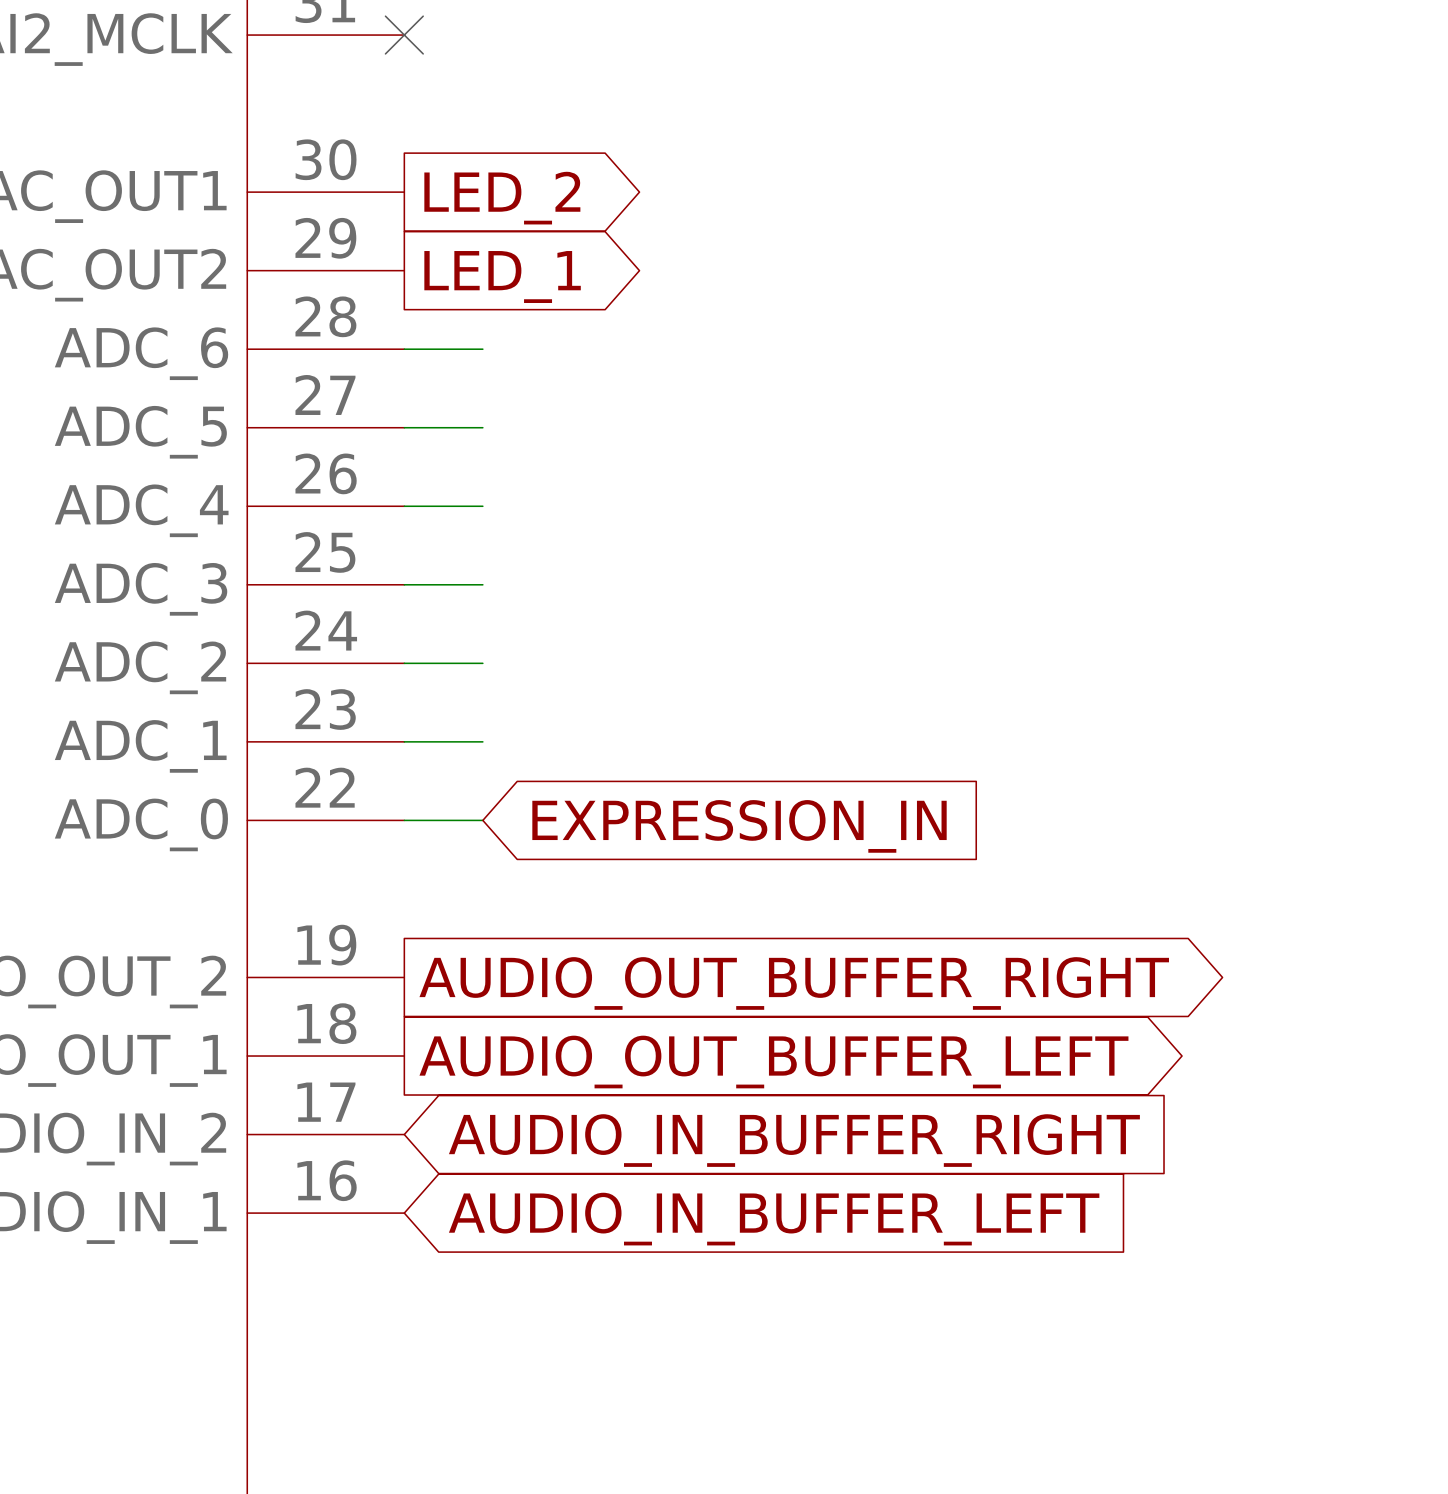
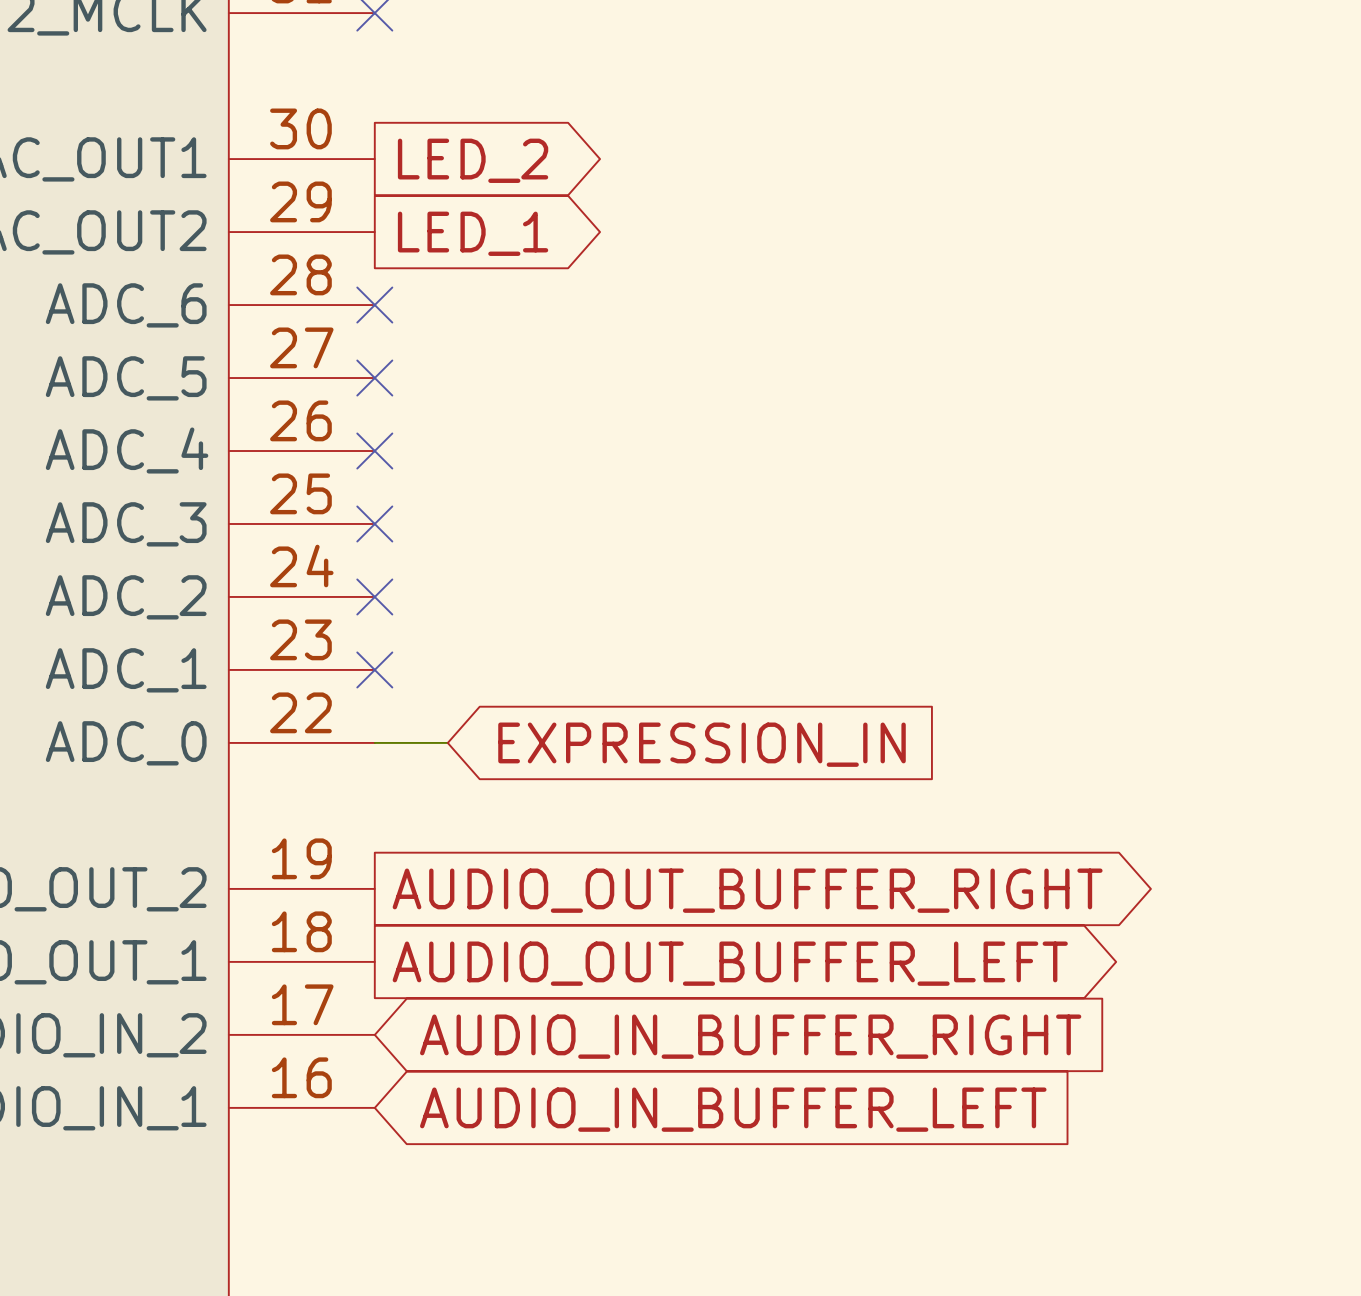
wire: (404, 349) (482, 349) -> none
no-connect mark: none -> (374, 305)
wire: (404, 427) (482, 427) -> none
no-connect mark: none -> (374, 378)
wire: (404, 506) (482, 506) -> none
no-connect mark: none -> (374, 451)
wire: (404, 584) (482, 584) -> none
no-connect mark: none -> (374, 523)
wire: (404, 663) (482, 663) -> none
no-connect mark: none -> (374, 596)
wire: (404, 741) (482, 741) -> none
no-connect mark: none -> (374, 669)

